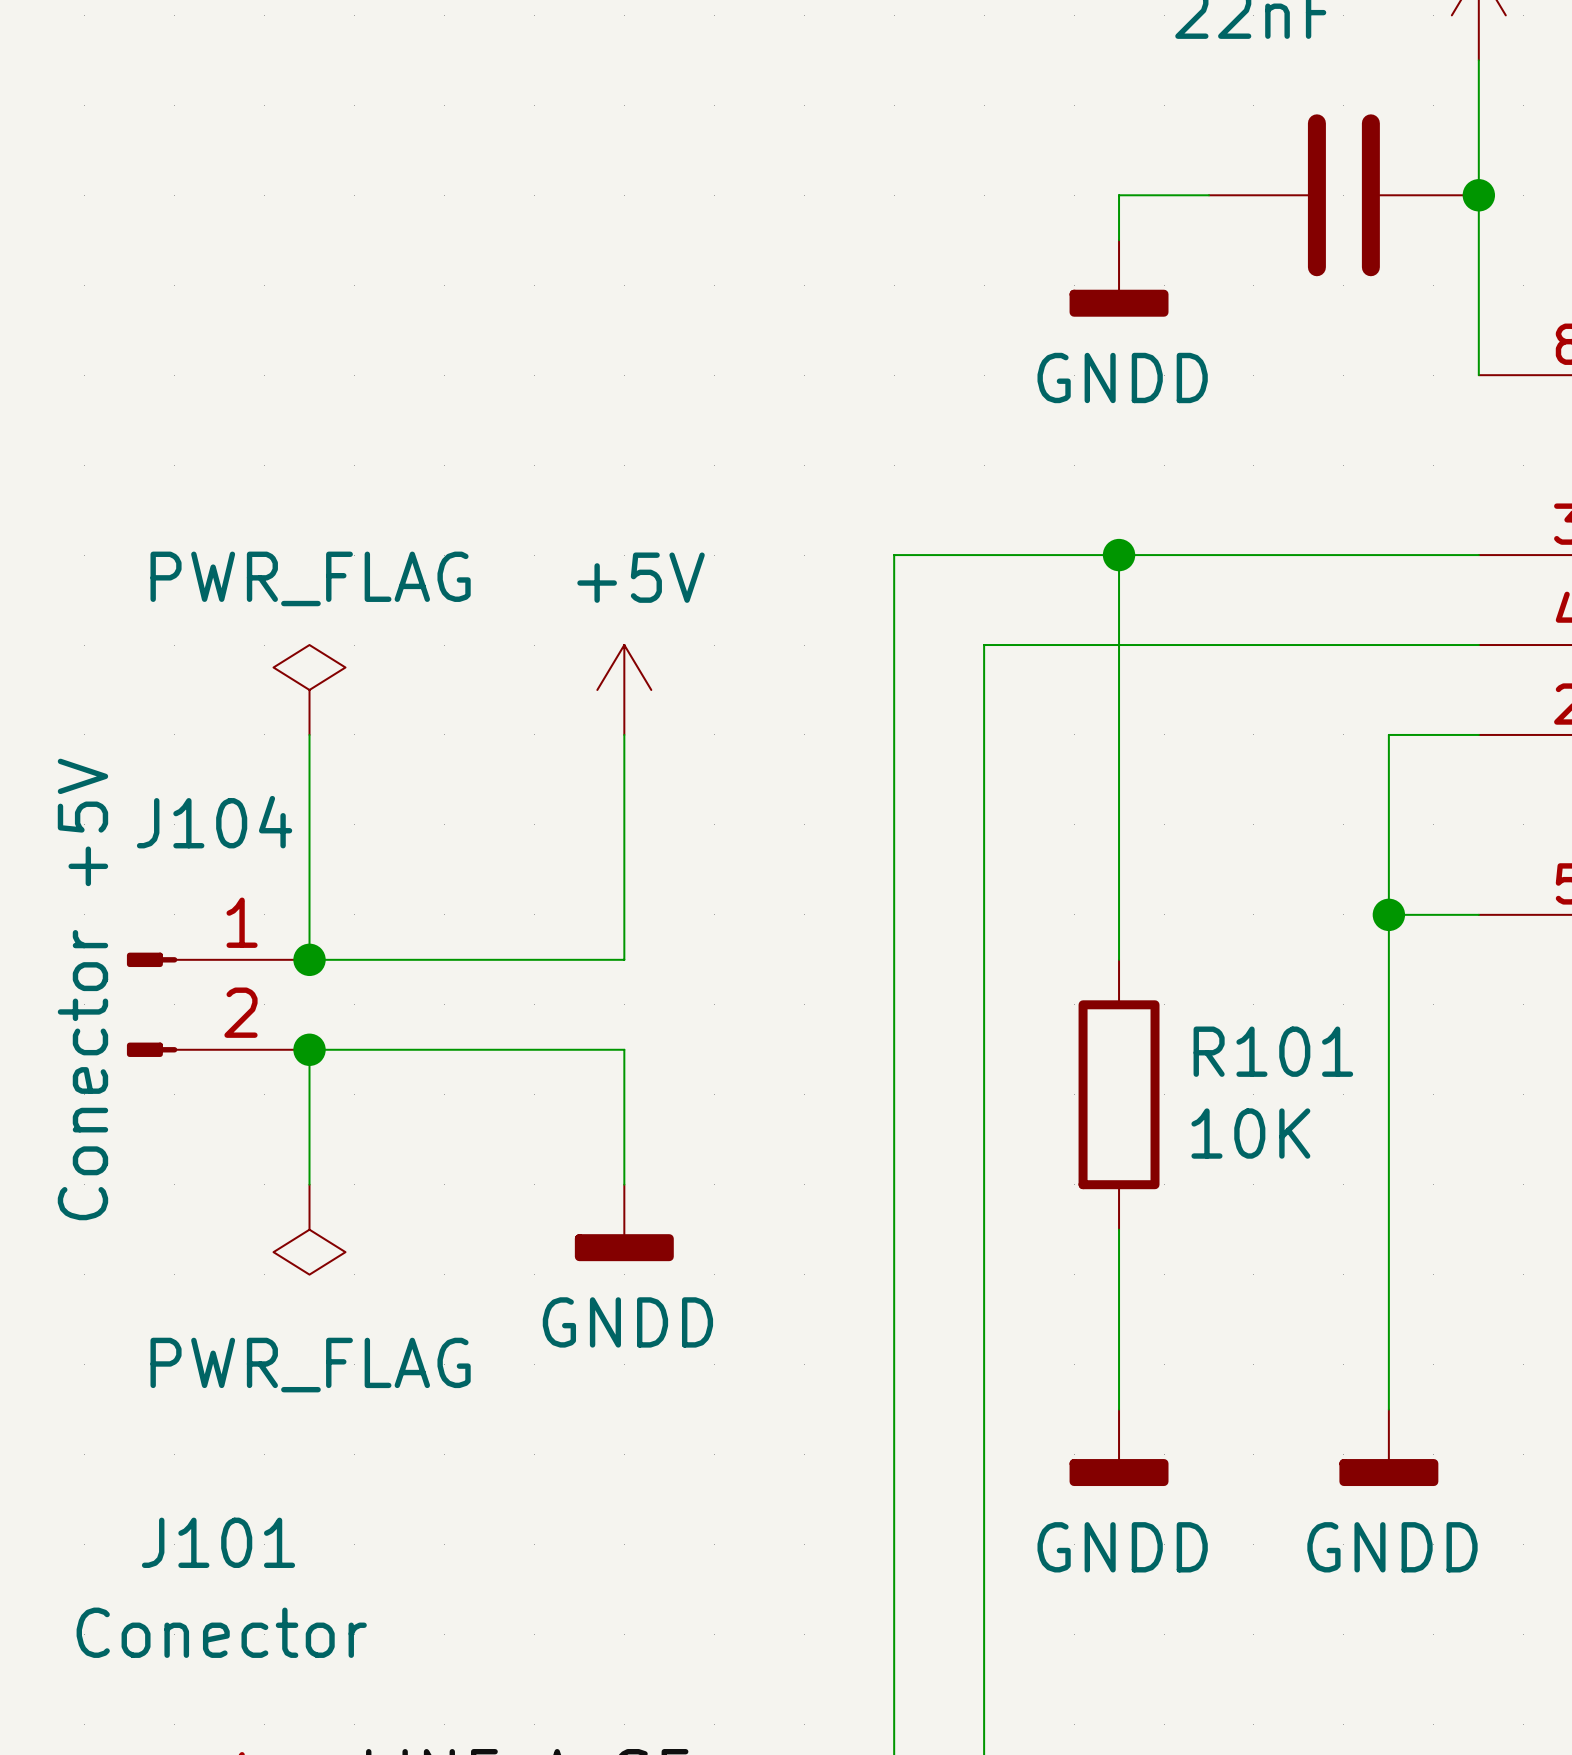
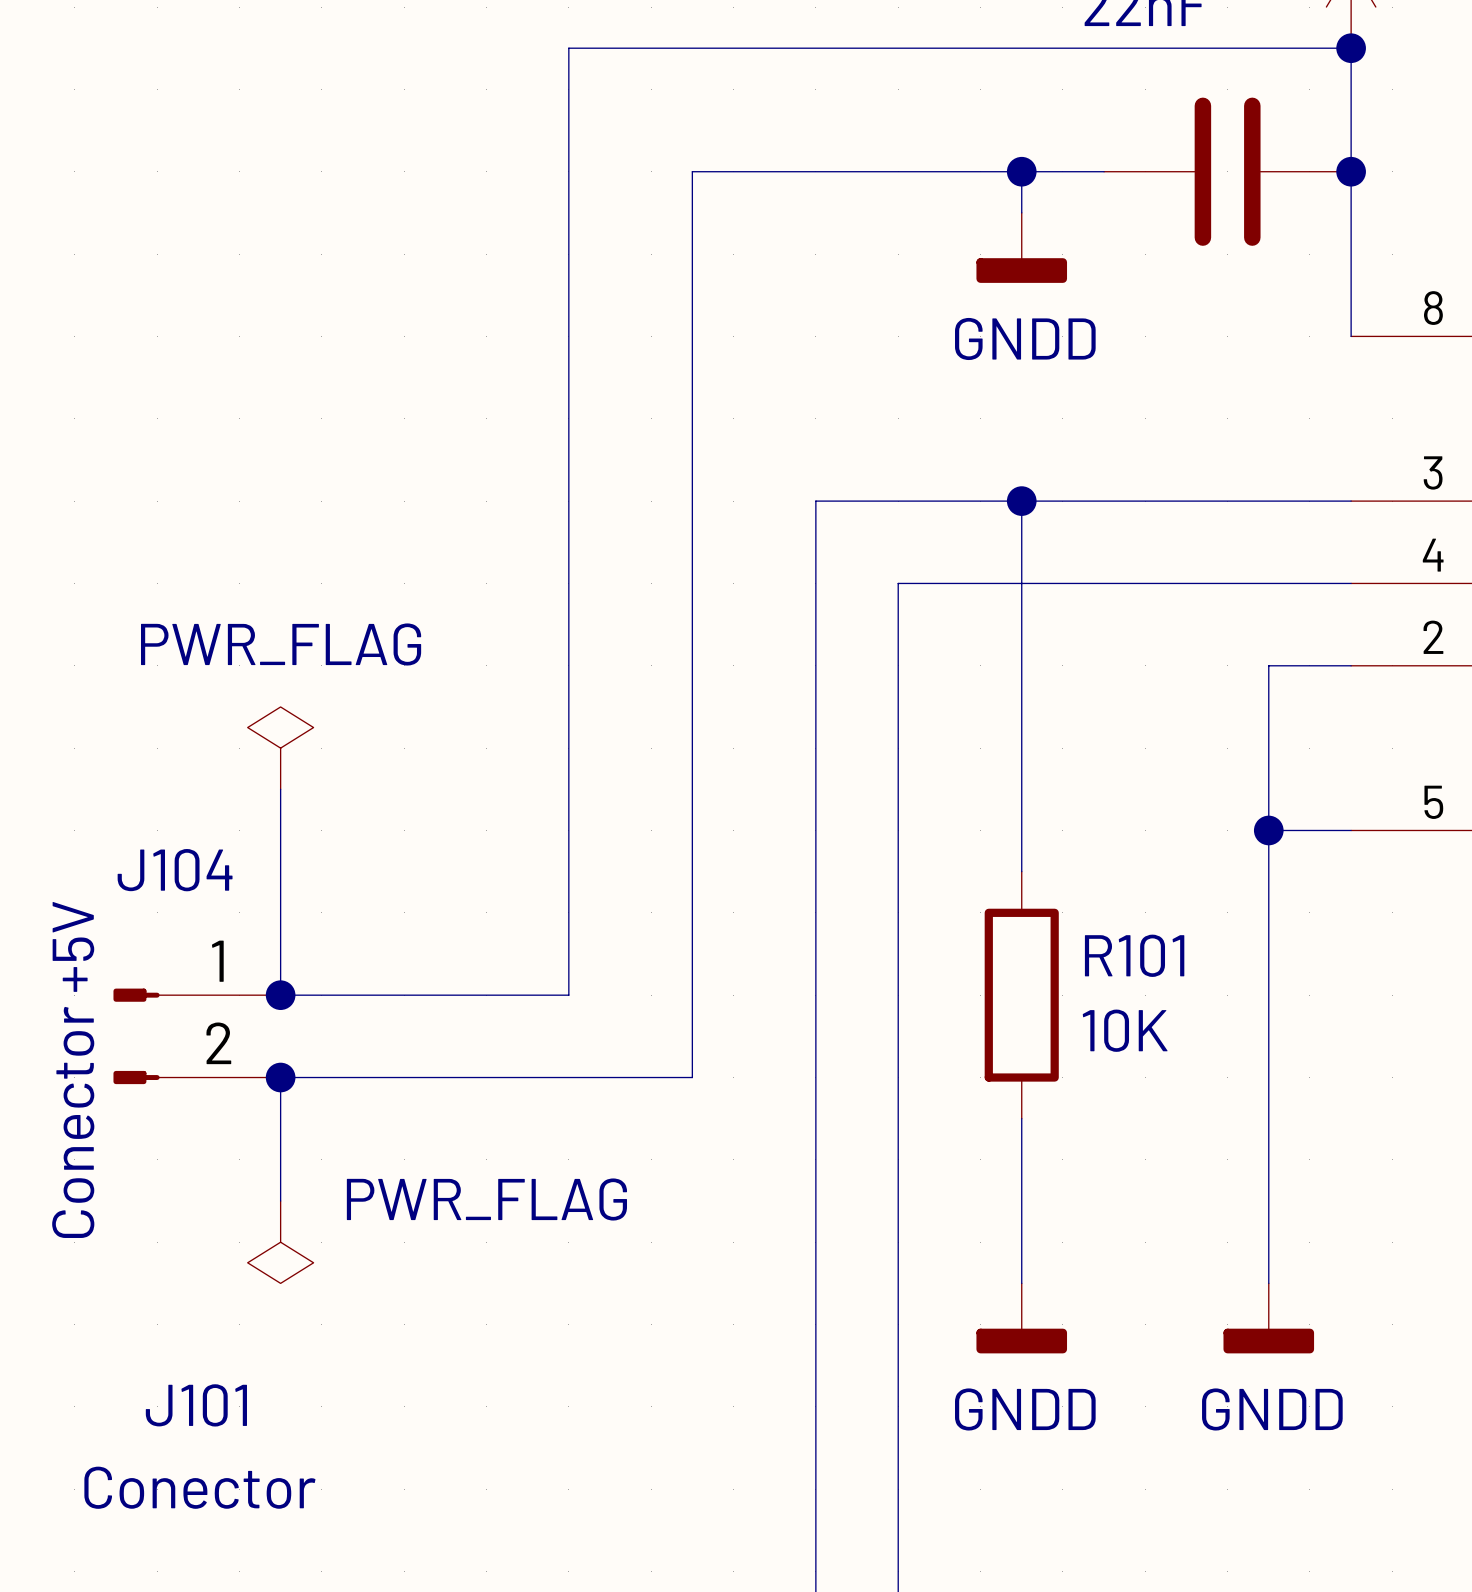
wire: none -> (1351, 48) (568, 48) (568, 665)
junction: none -> (1351, 48)
wire: none -> (1021, 171) (692, 171) (692, 1077) (280, 1077) (280, 1201)
junction: none -> (1021, 171)
power symbol position: PWR_FLAG (309, 689) -> PWR_FLAG (280, 748)
power symbol: +5V (624, 689) -> none
wire: (309, 734) (309, 869) -> none
wire: (309, 959) (624, 959) -> (280, 871) (280, 954)
junction: (309, 959) -> none
J104 position: (218, 1004) -> (197, 1036)
wire: (309, 1049) (624, 1049) -> (568, 871) (568, 954)
junction position: (309, 1049) -> (280, 995)
wire: (309, 1094) (309, 1184) -> (280, 995) (568, 995)
wire: (624, 1094) (624, 1184) -> none
junction: none -> (280, 1077)
power symbol: GNDD (624, 1222) -> none
power symbol position: PWR_FLAG (309, 1229) -> PWR_FLAG (280, 1242)
power symbol text position: PWR_FLAG (310, 1365) -> PWR_FLAG (486, 1199)

